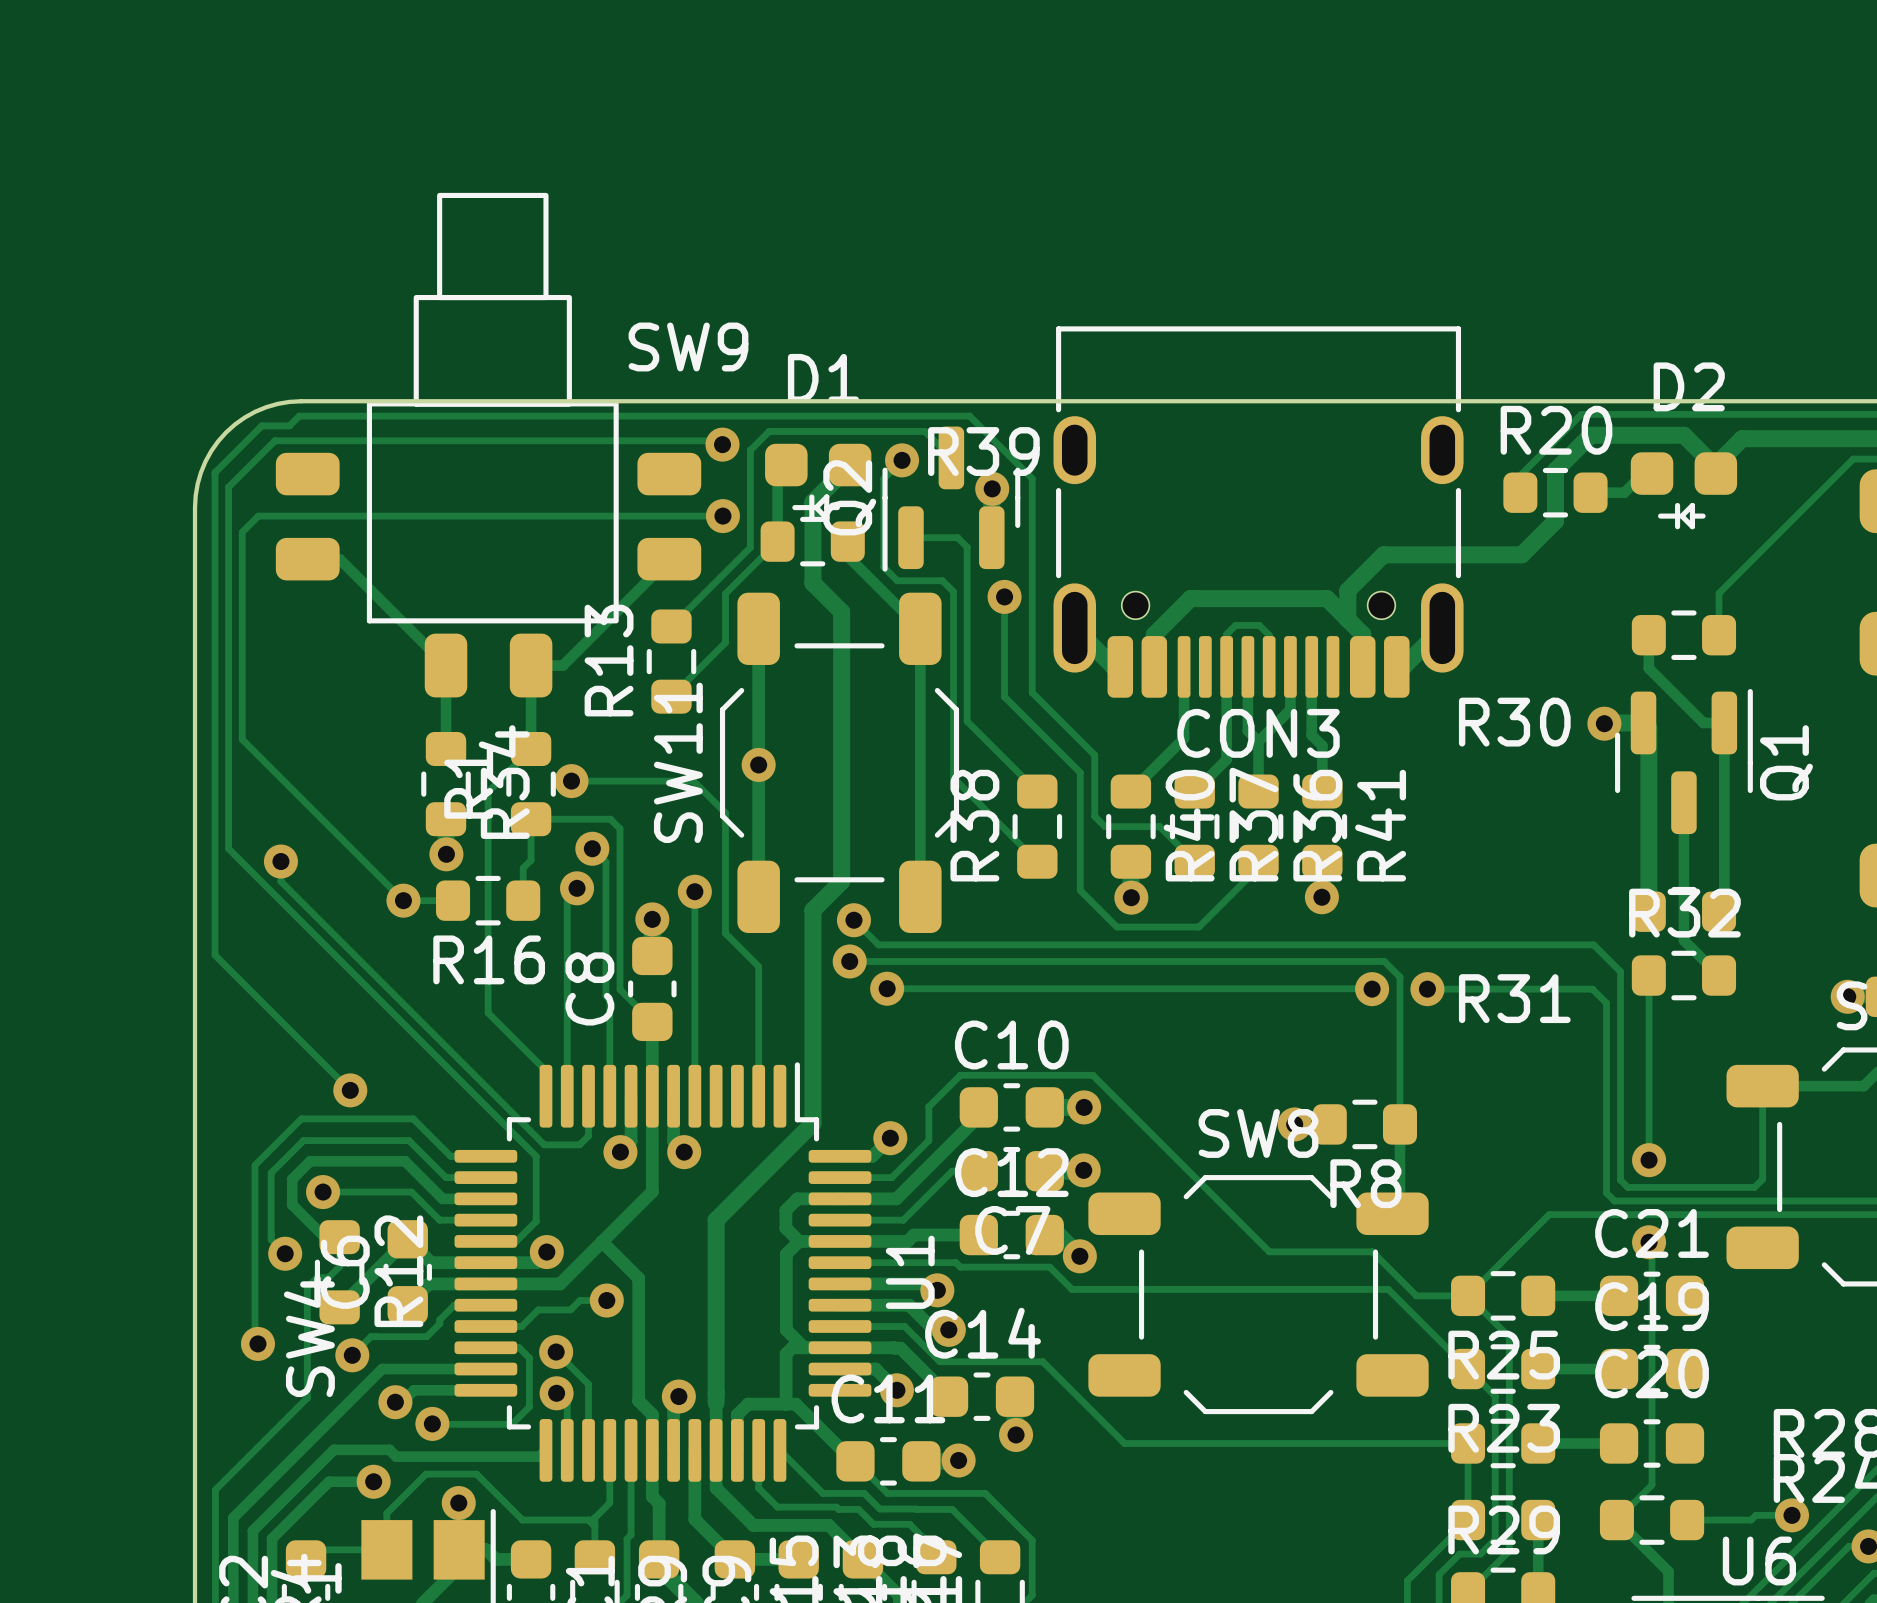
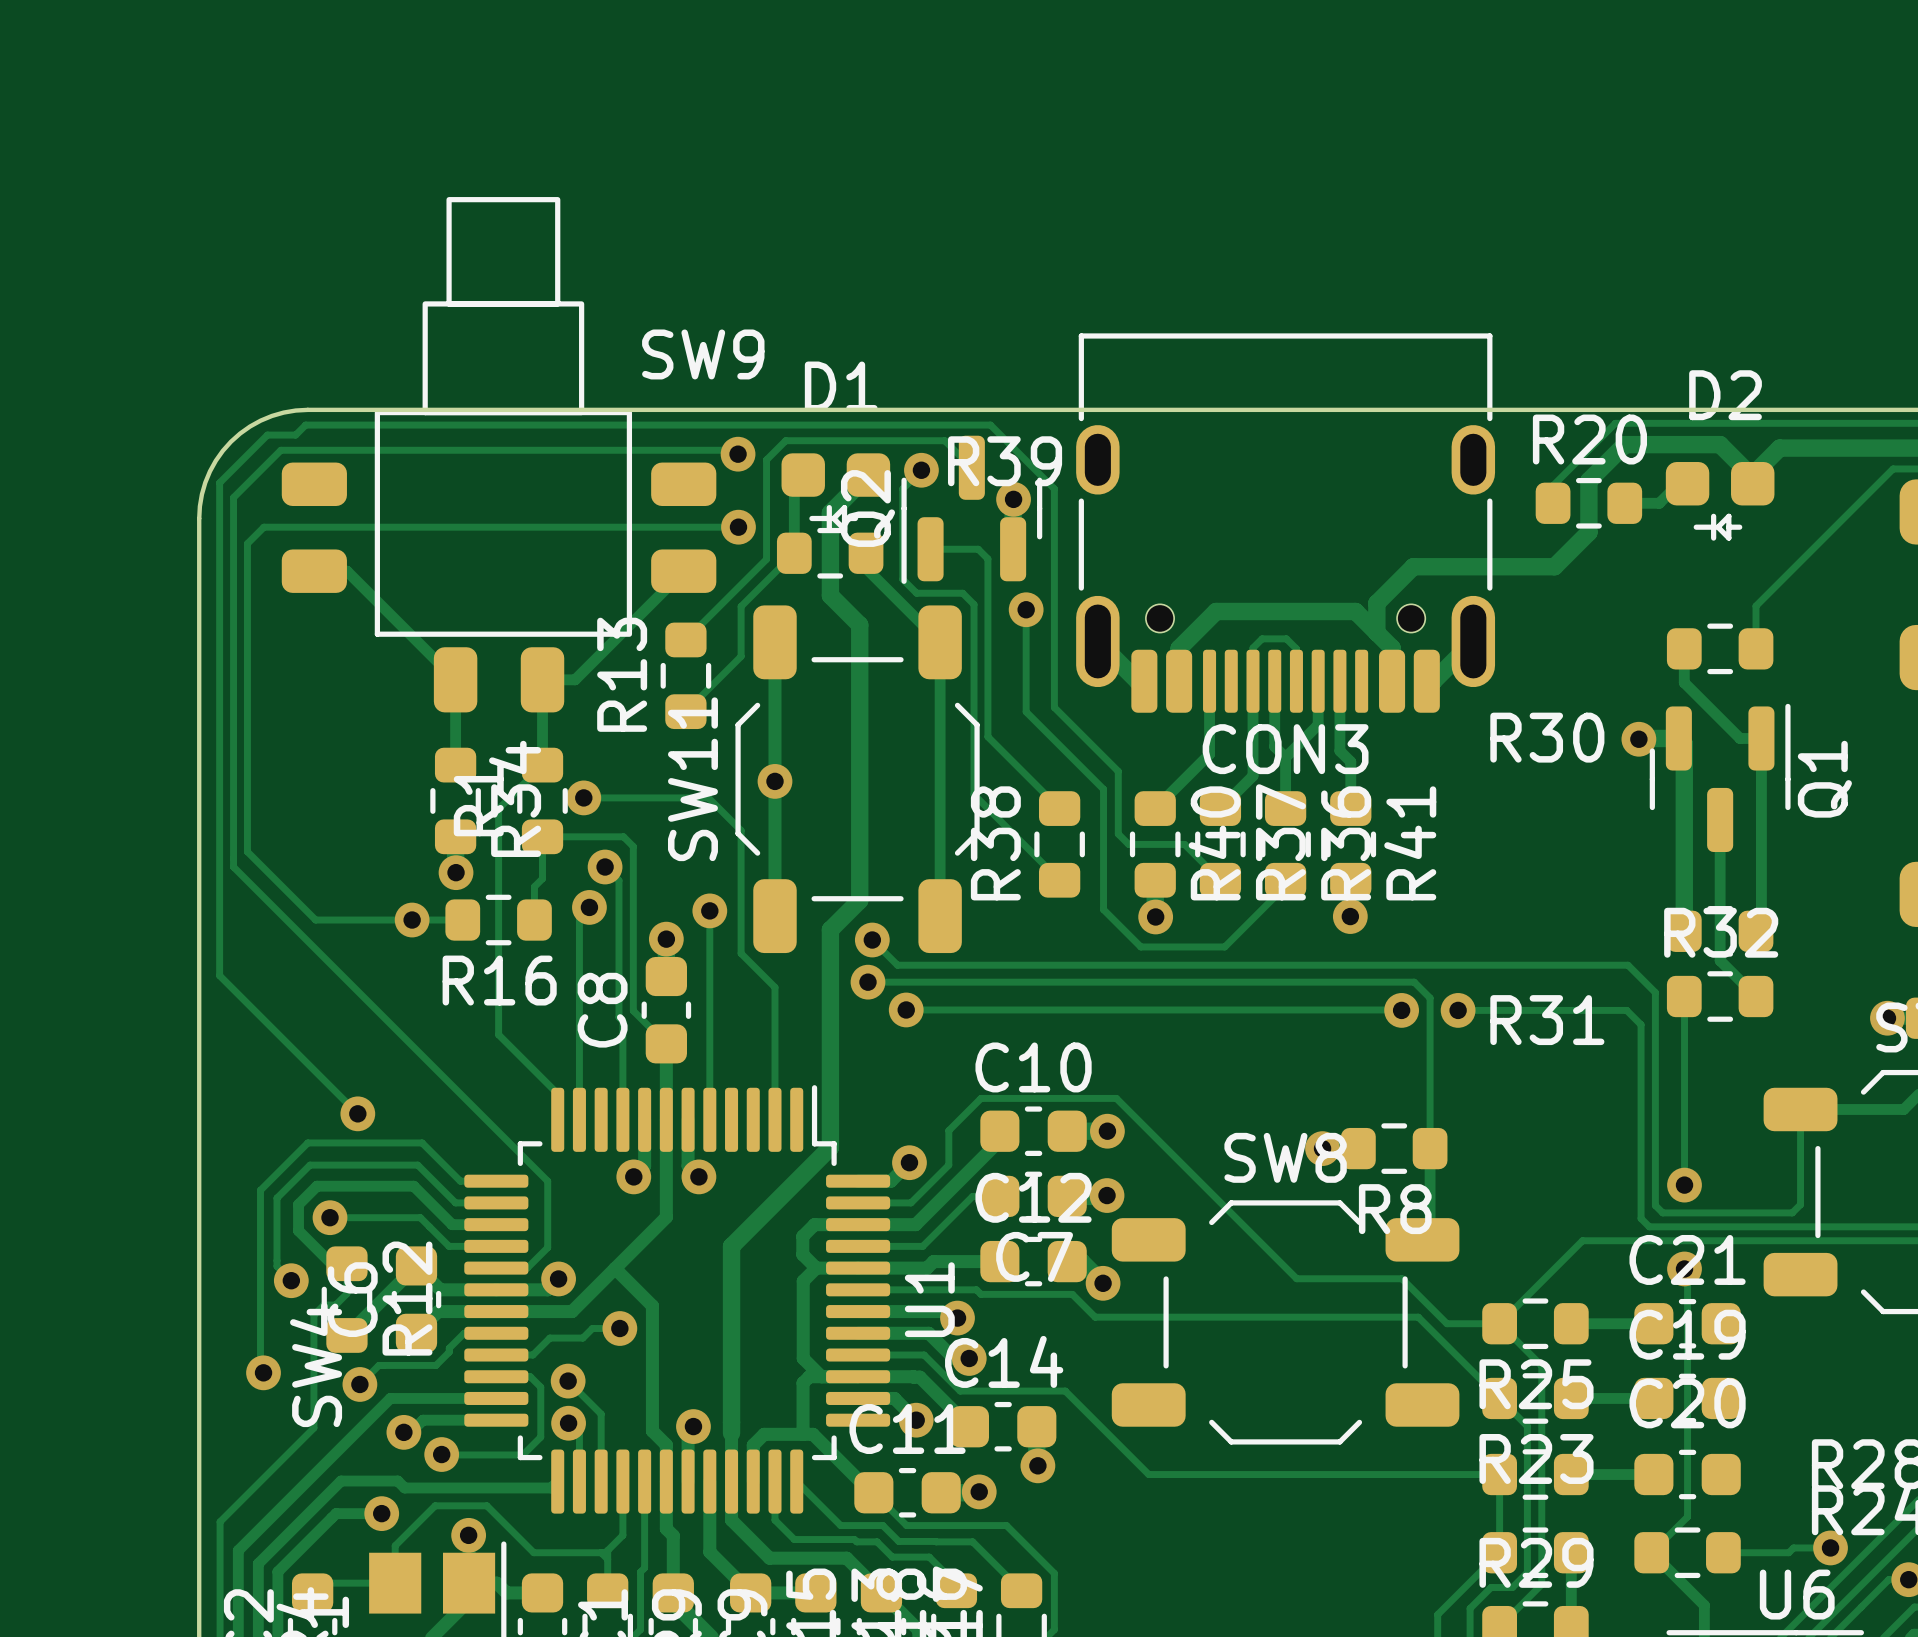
track: (242, 739) (403, 900) -> (247, 755) (247, 851) (315, 920) (412, 920)
track: (280, 861) (280, 881) (544, 1144) (579, 1144) (588, 1135) (588, 1096) -> none
via: (280, 861) -> none

